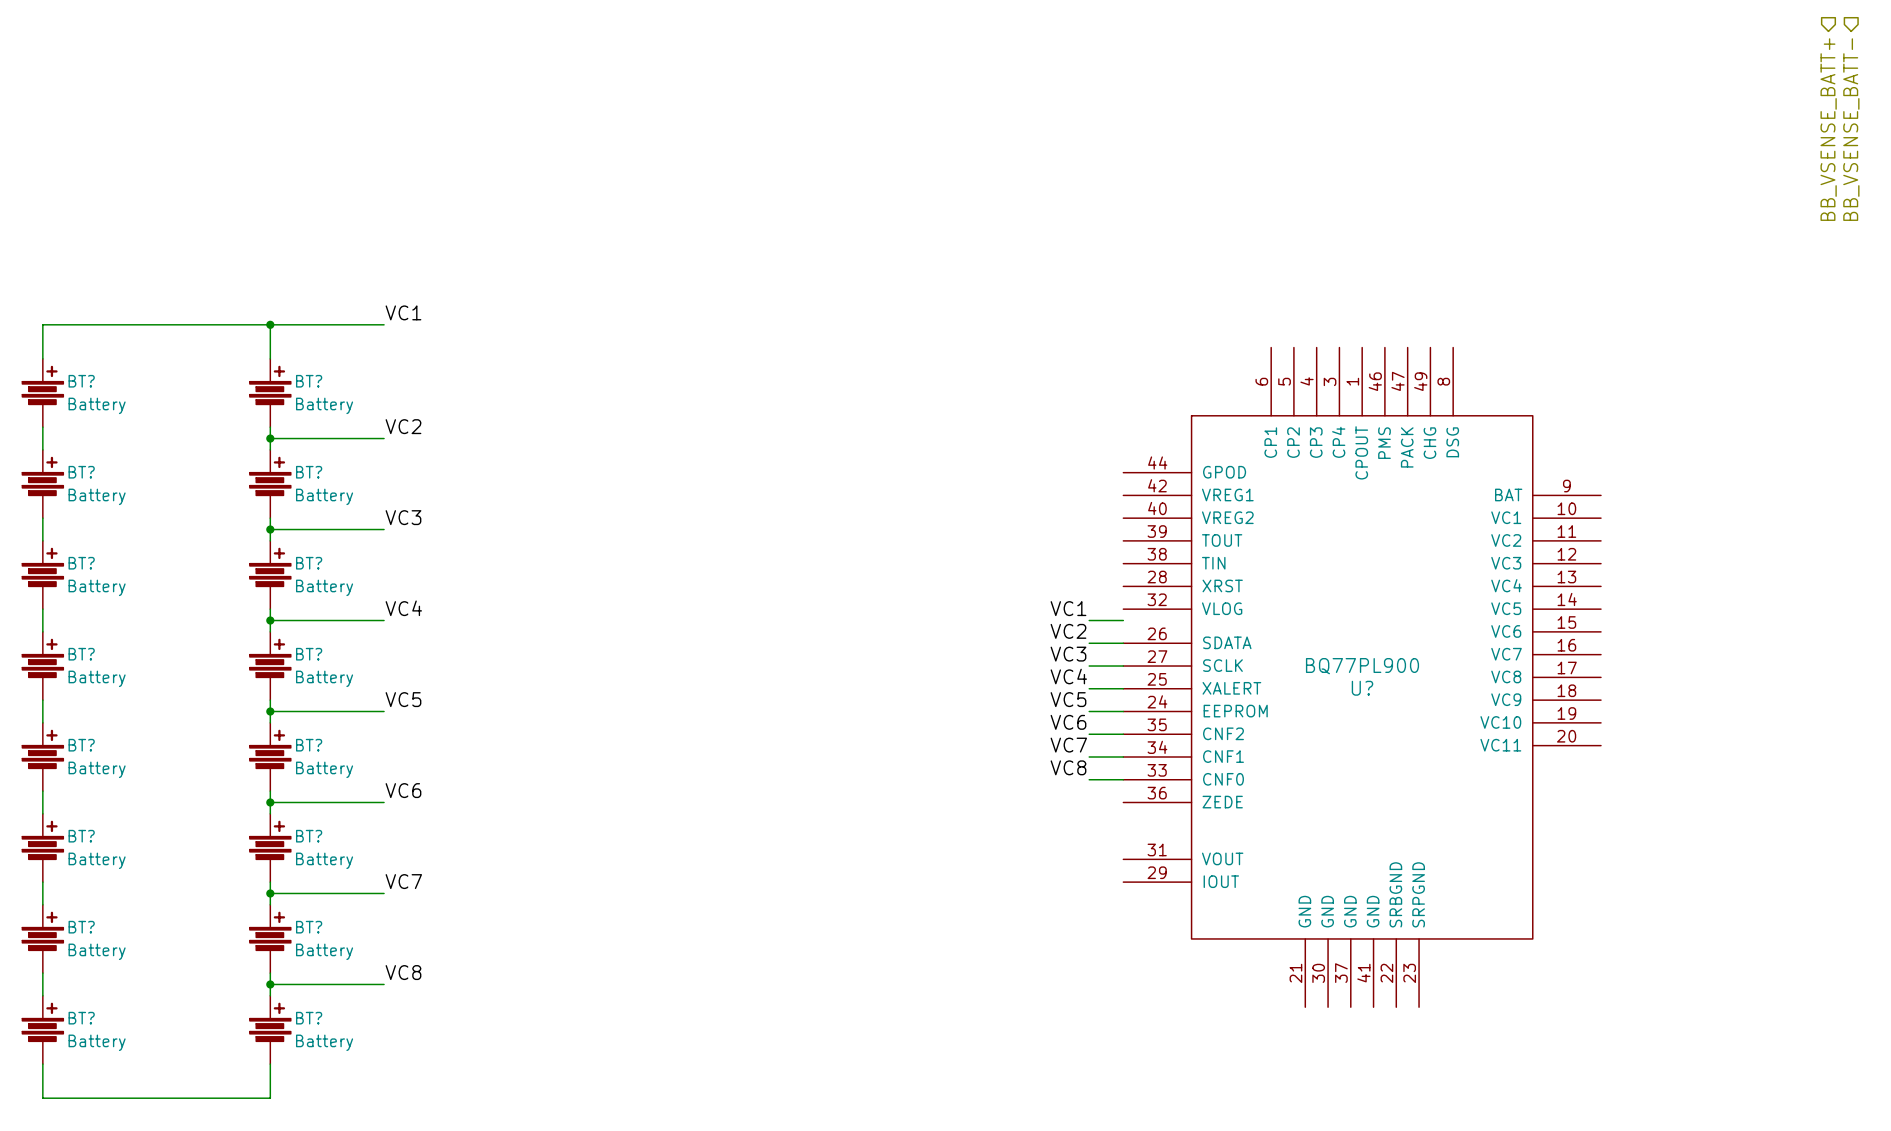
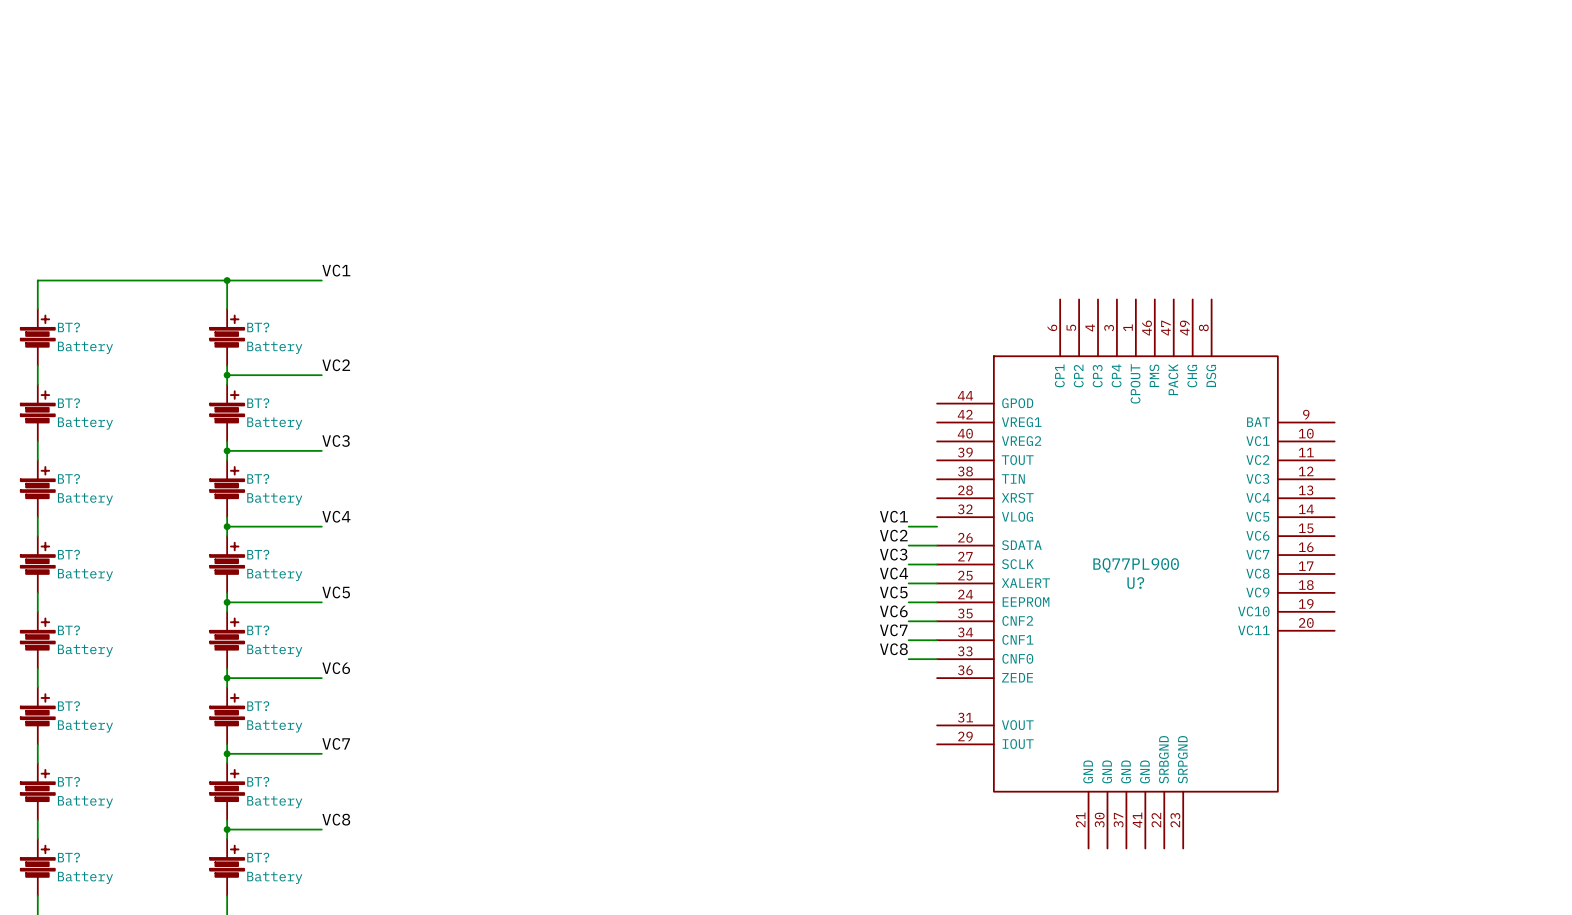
hierarchical label: BB_VSENSE_BATT+ (1828, 129) -> none
hierarchical label: BB_VSENSE_BATT- (1851, 129) -> none

